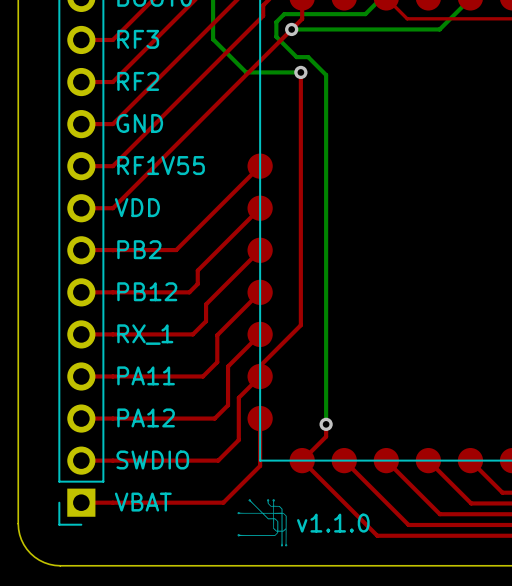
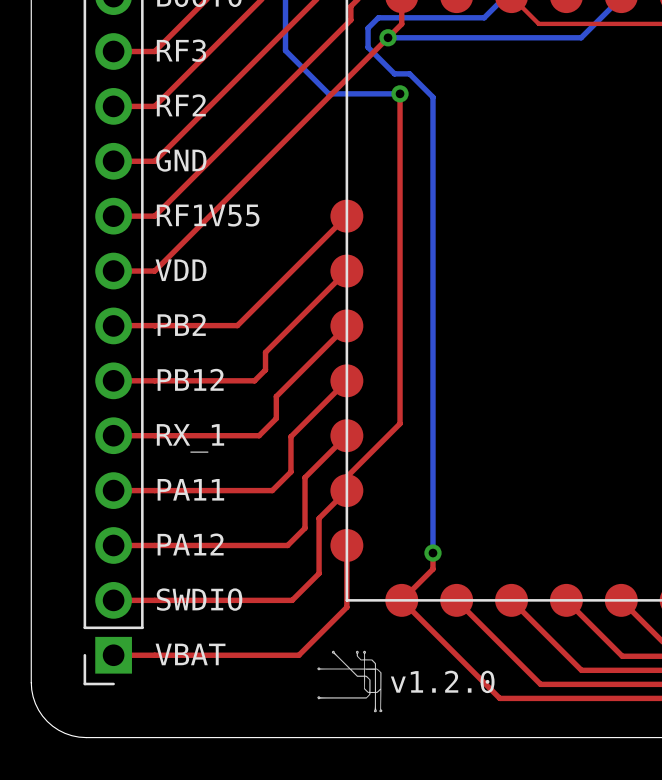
text: v1.1.0 (333, 523) -> v1.2.0 (442, 681)

